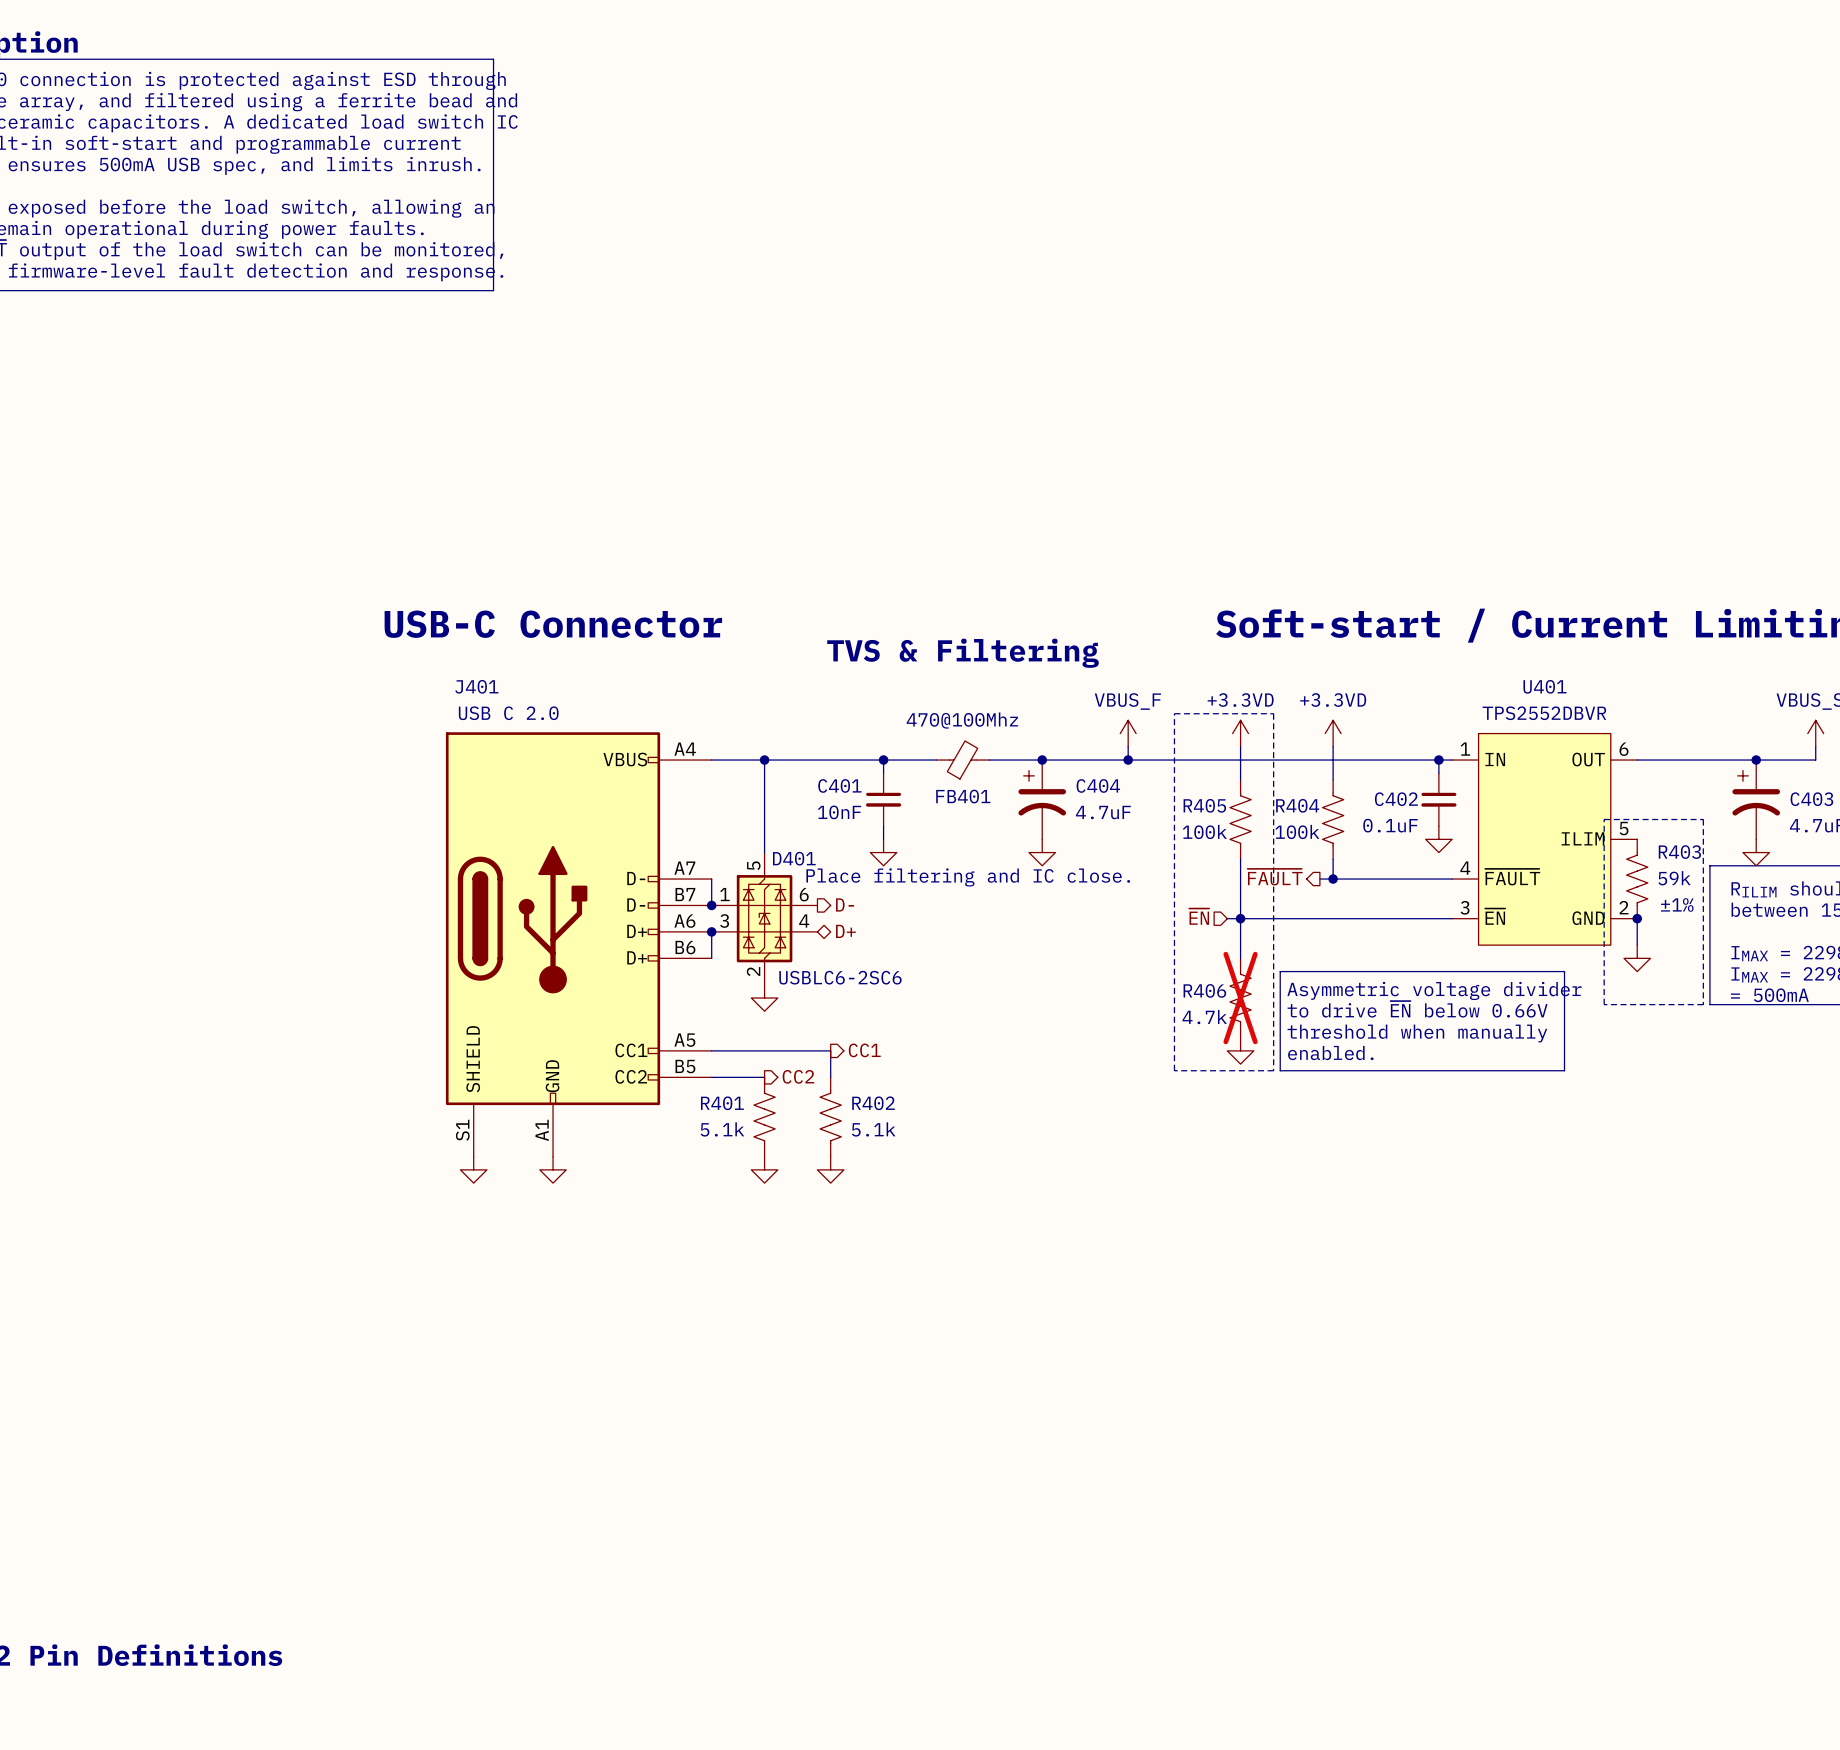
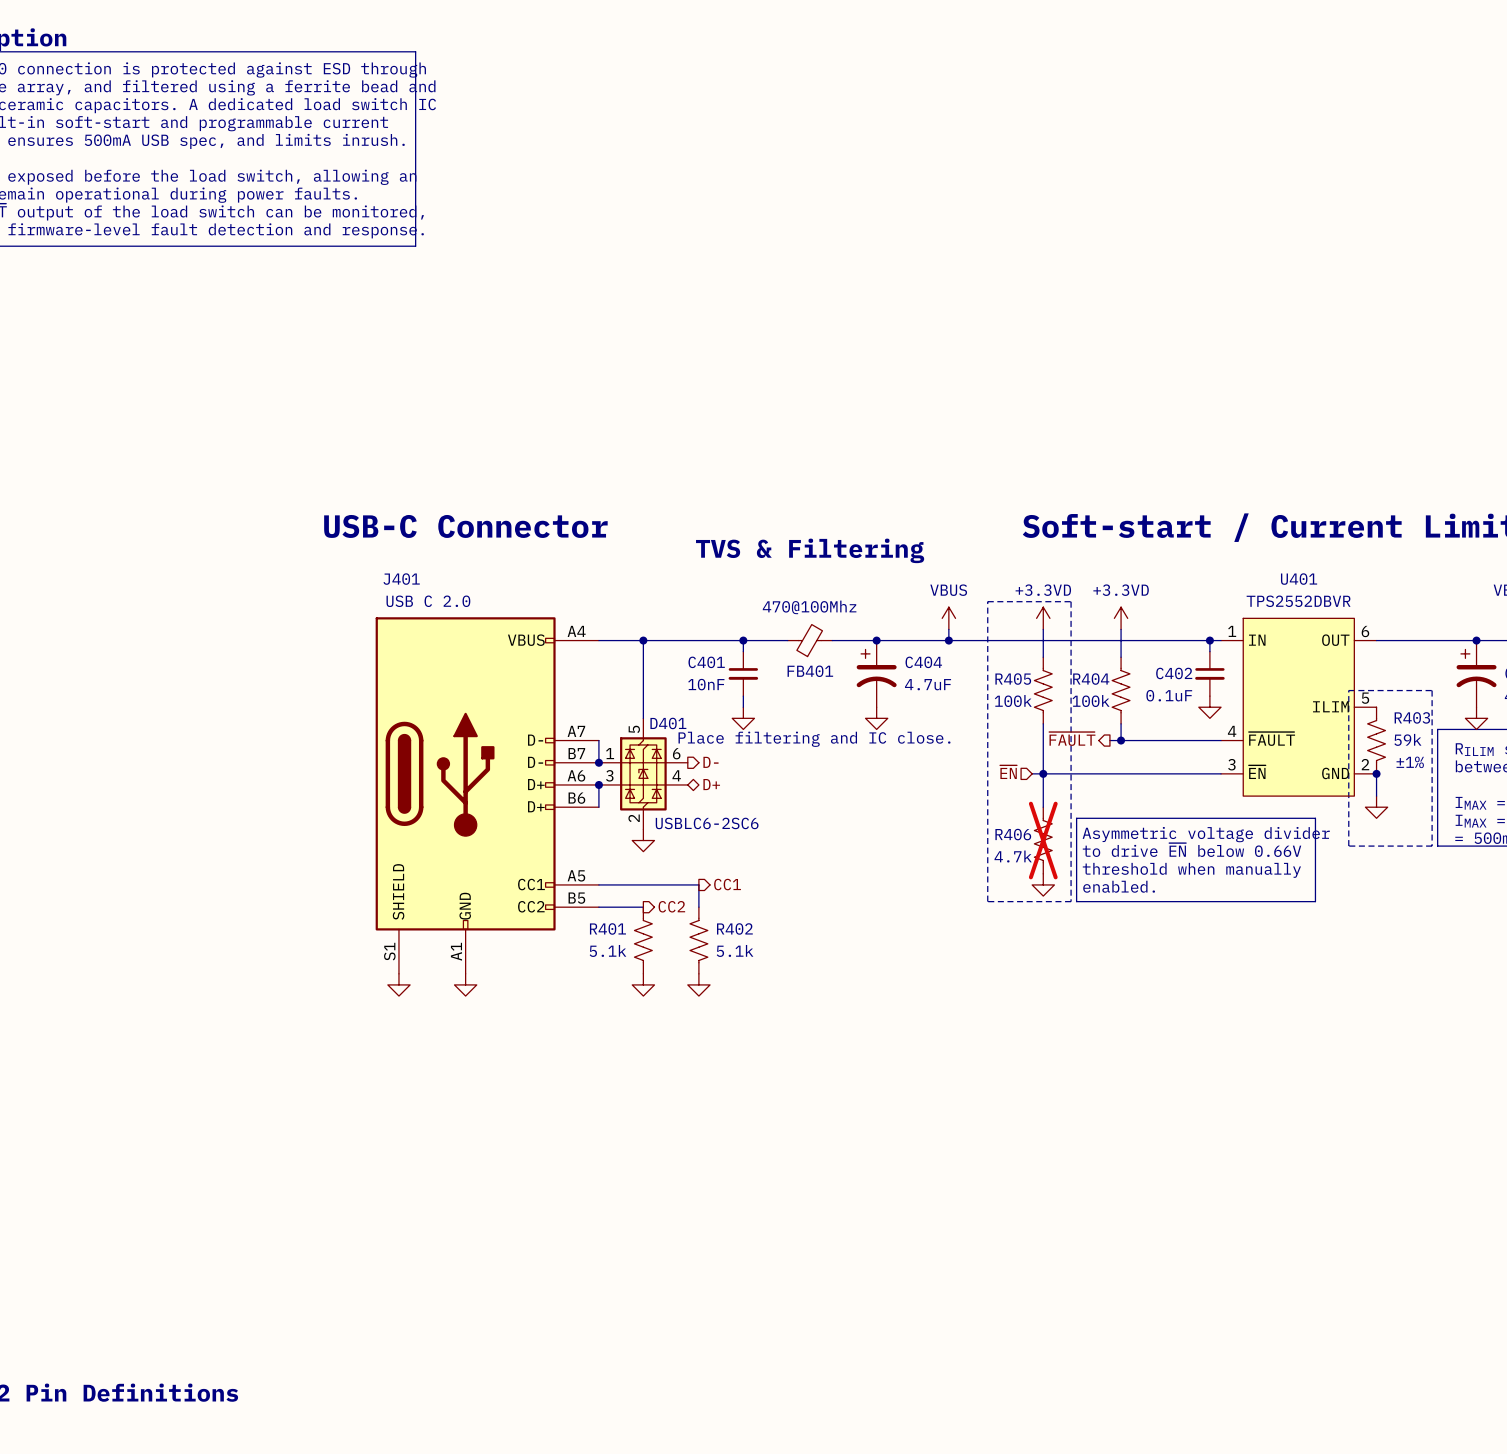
power symbol: VBUS_F (1128, 733) -> VBUS (948, 618)

